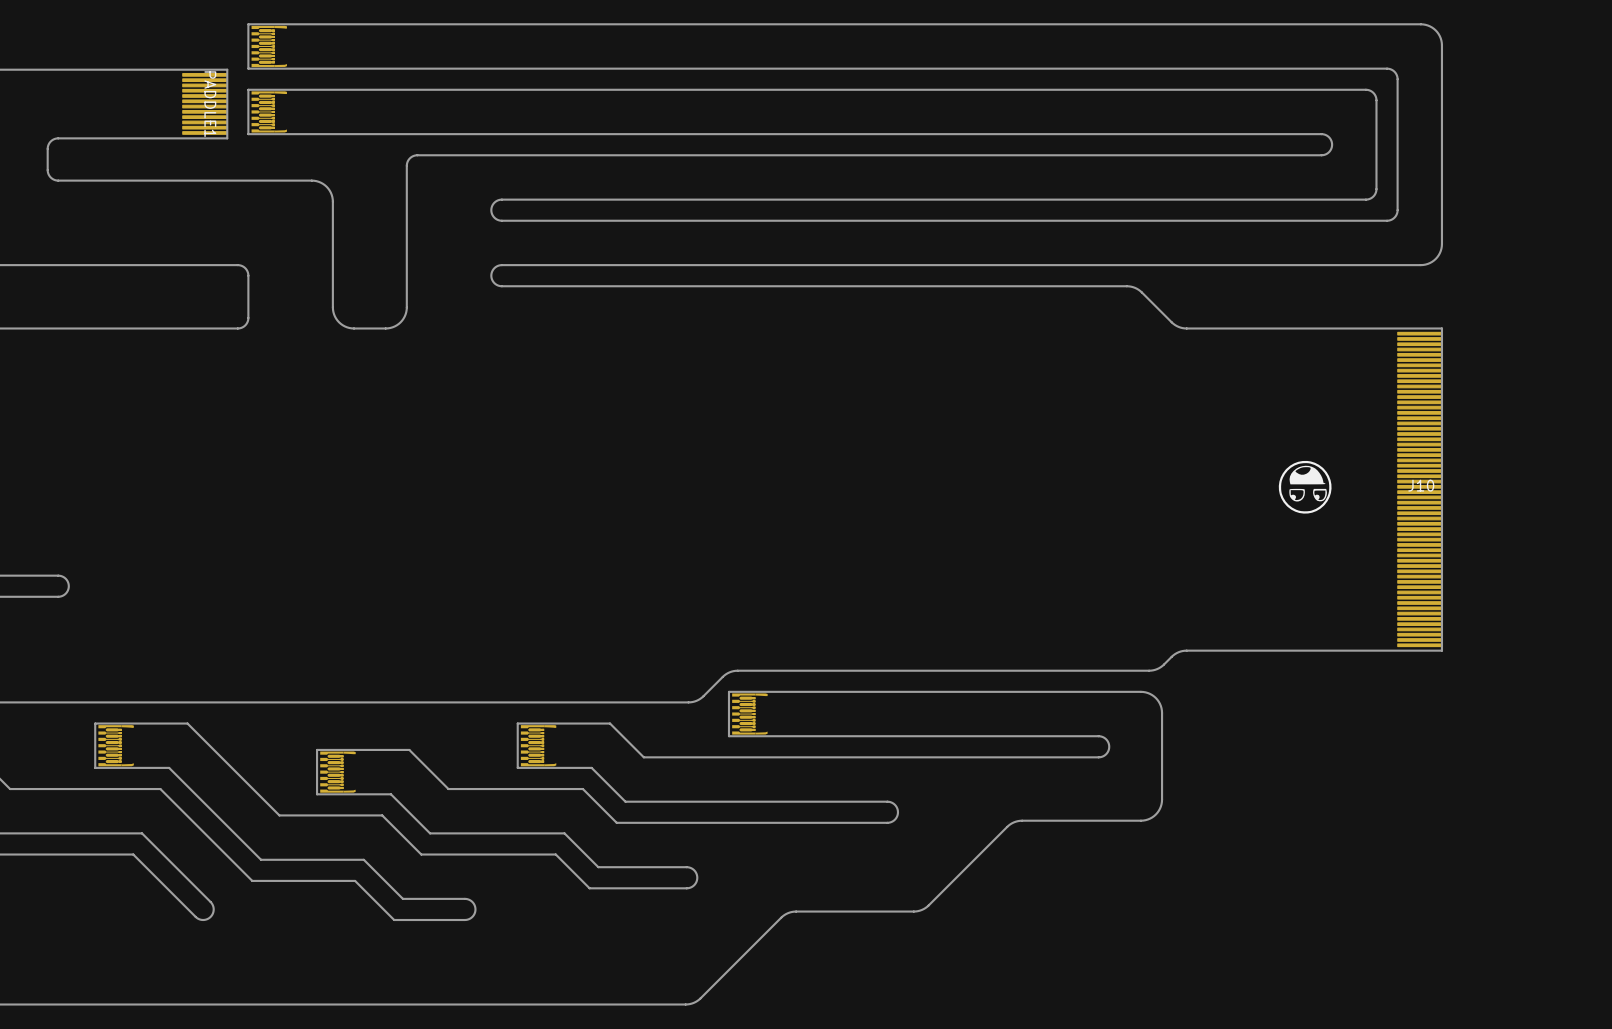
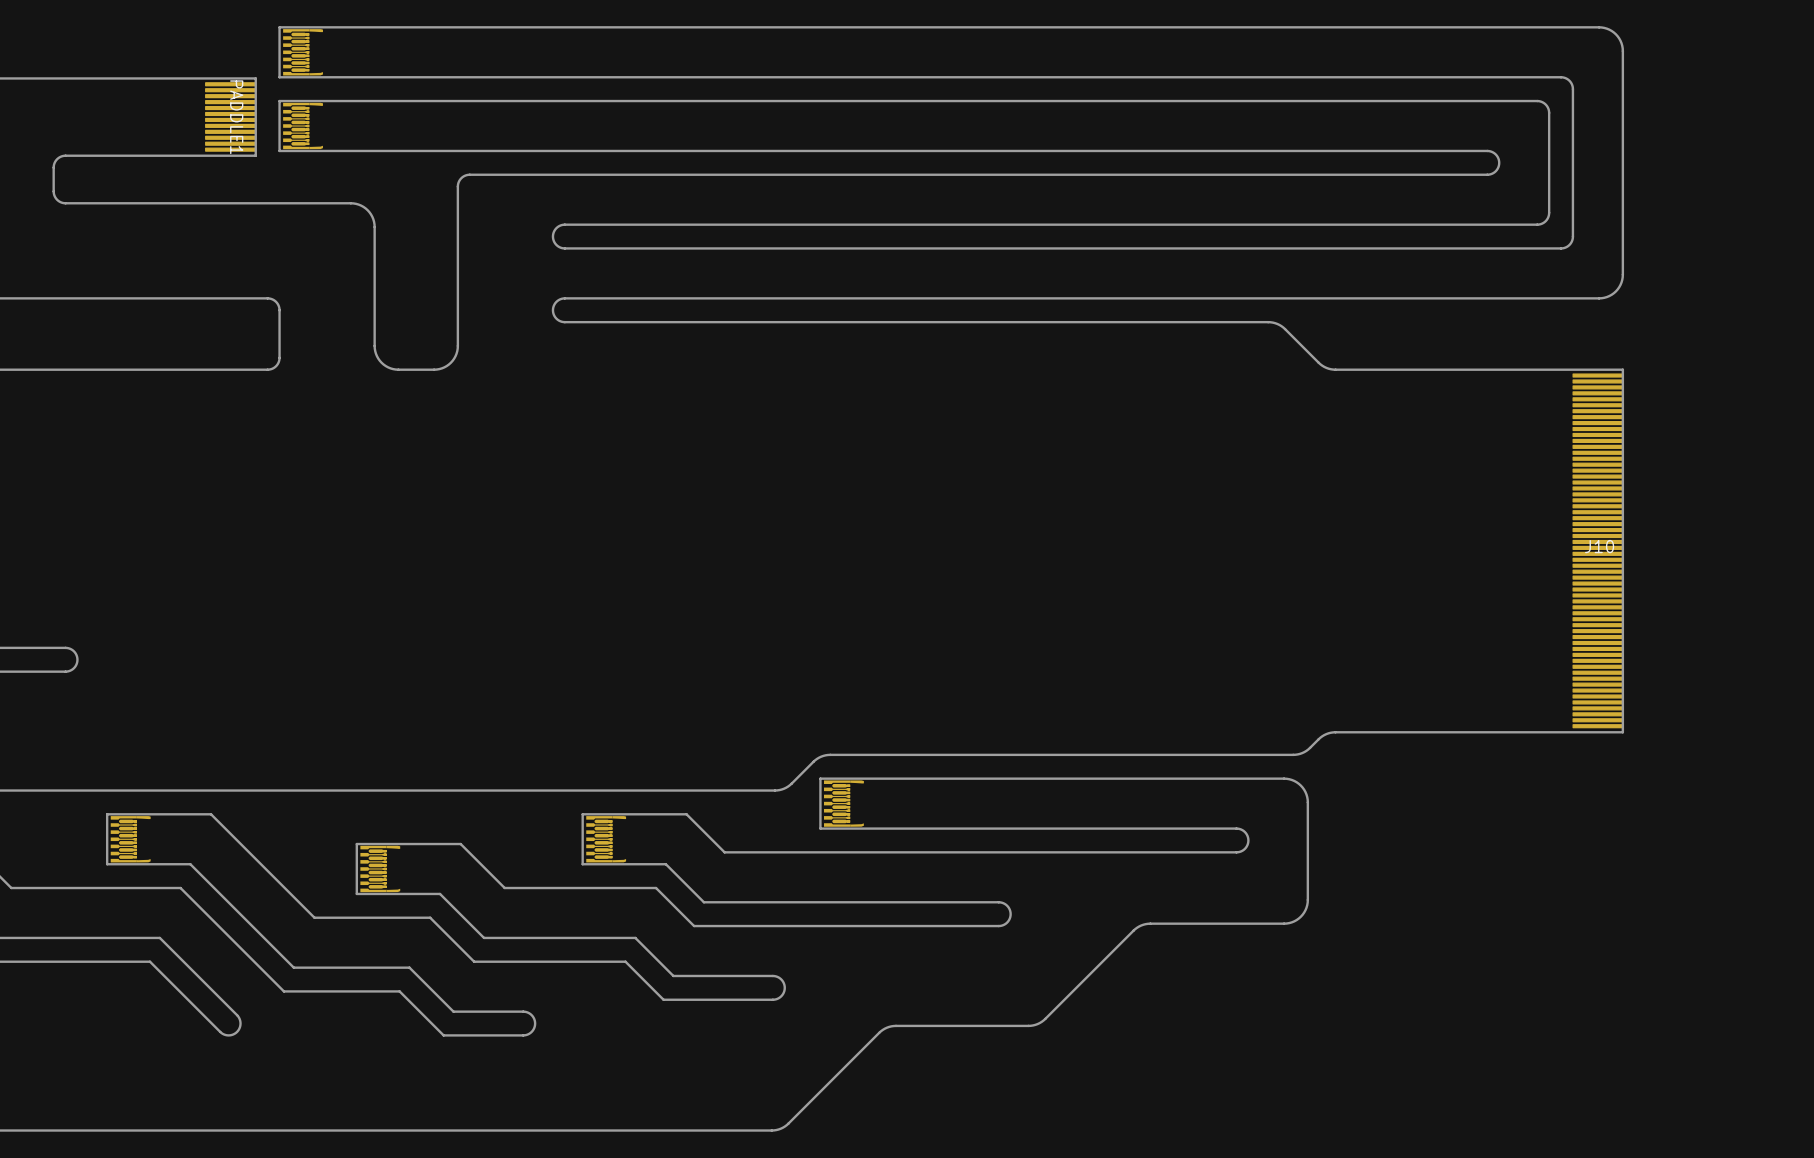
drawing: [1278, 460, 1332, 514] -> none

